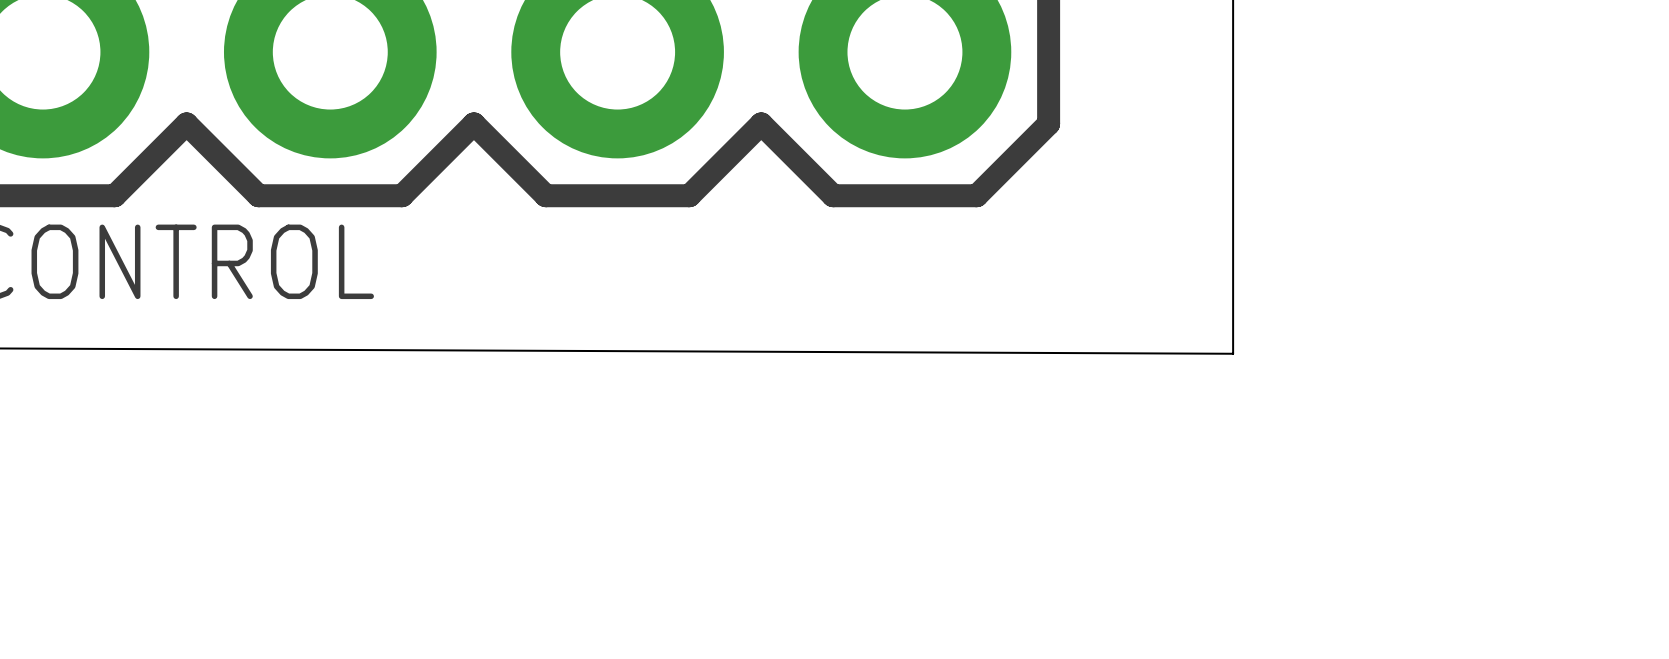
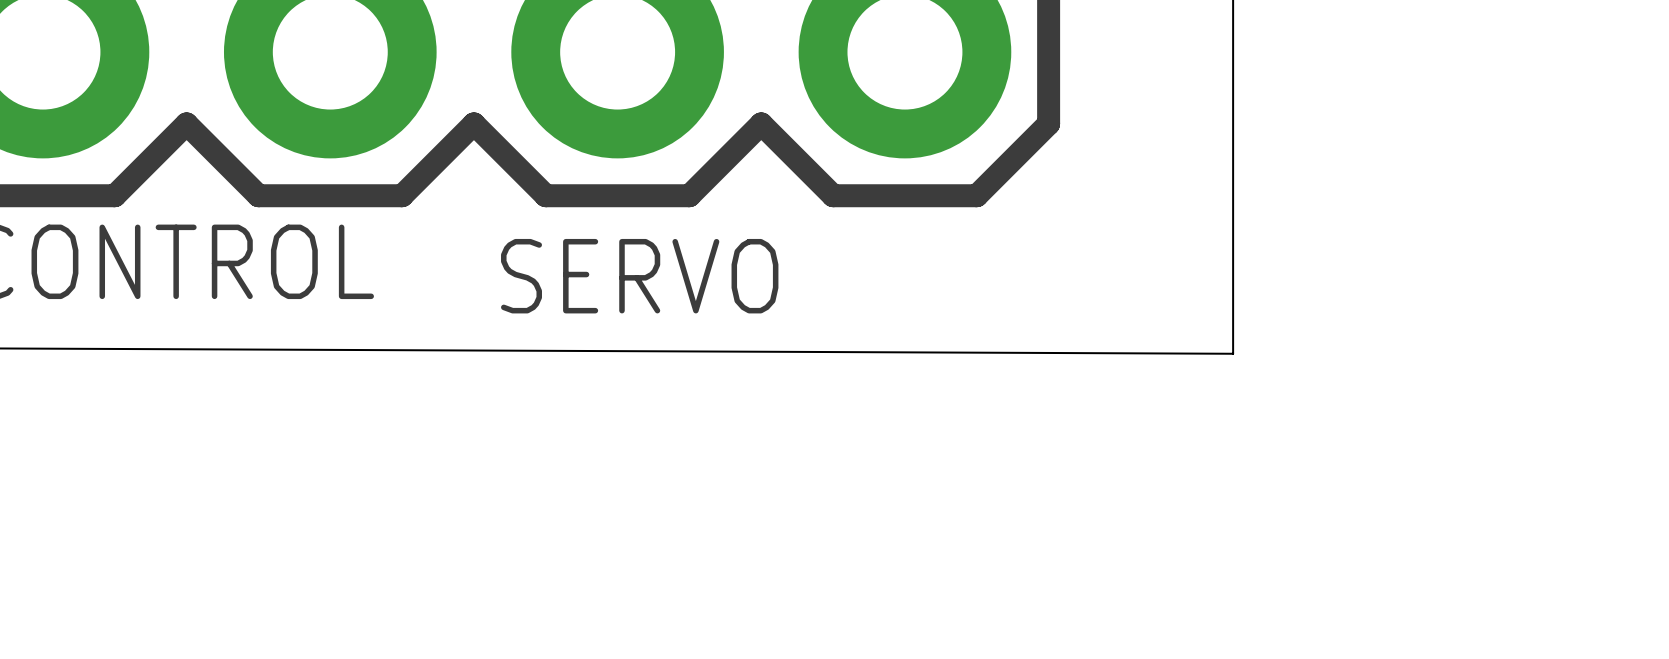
text: none -> SERVO (639, 276)

